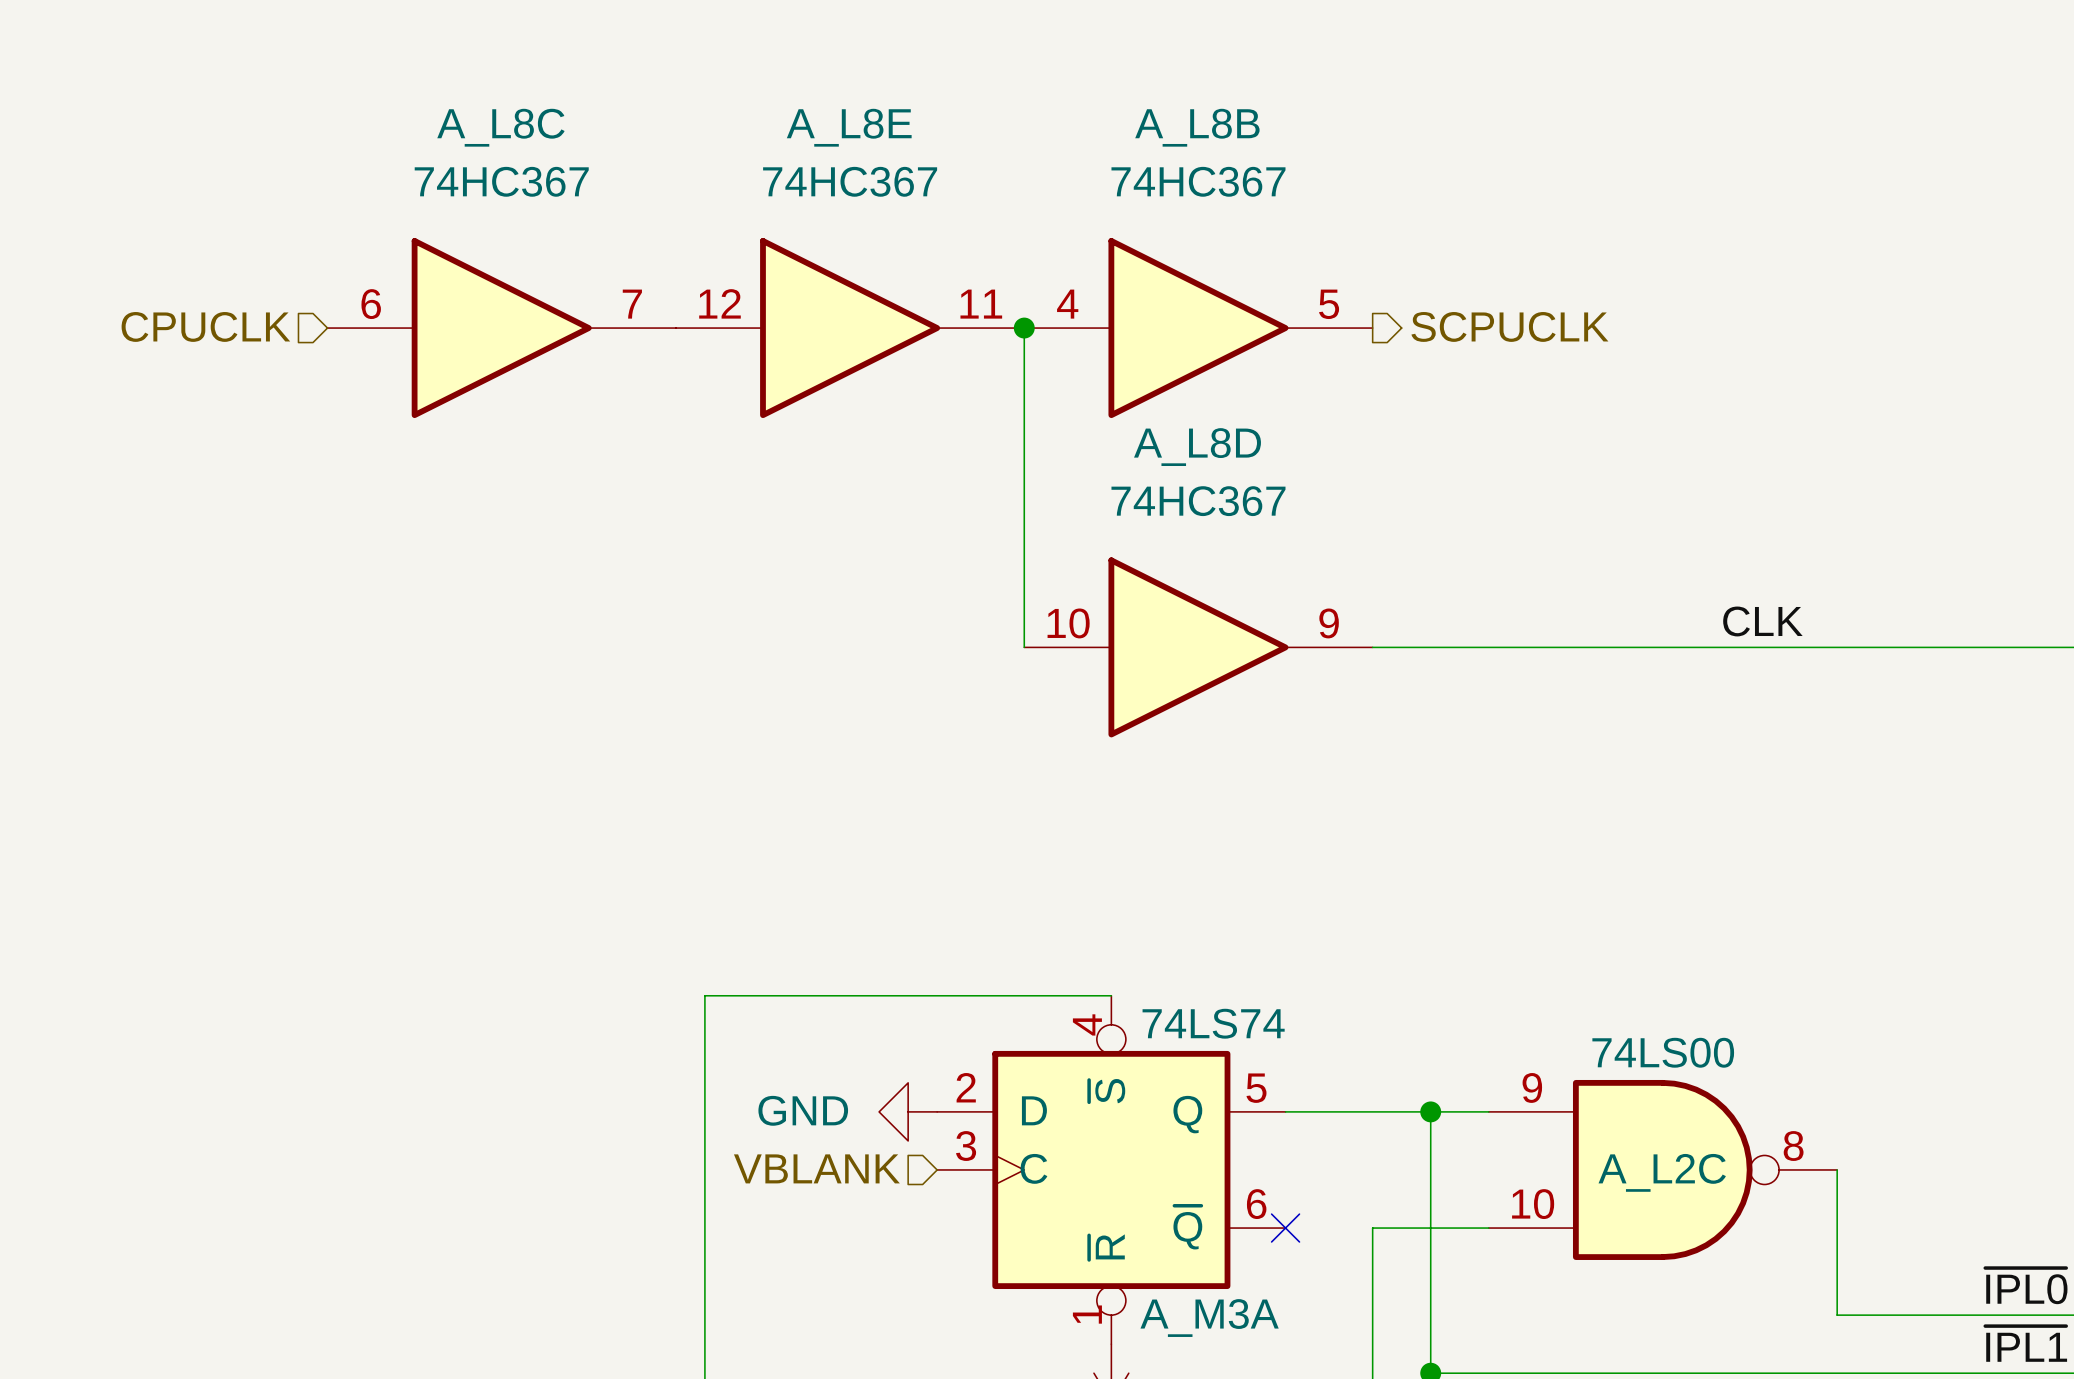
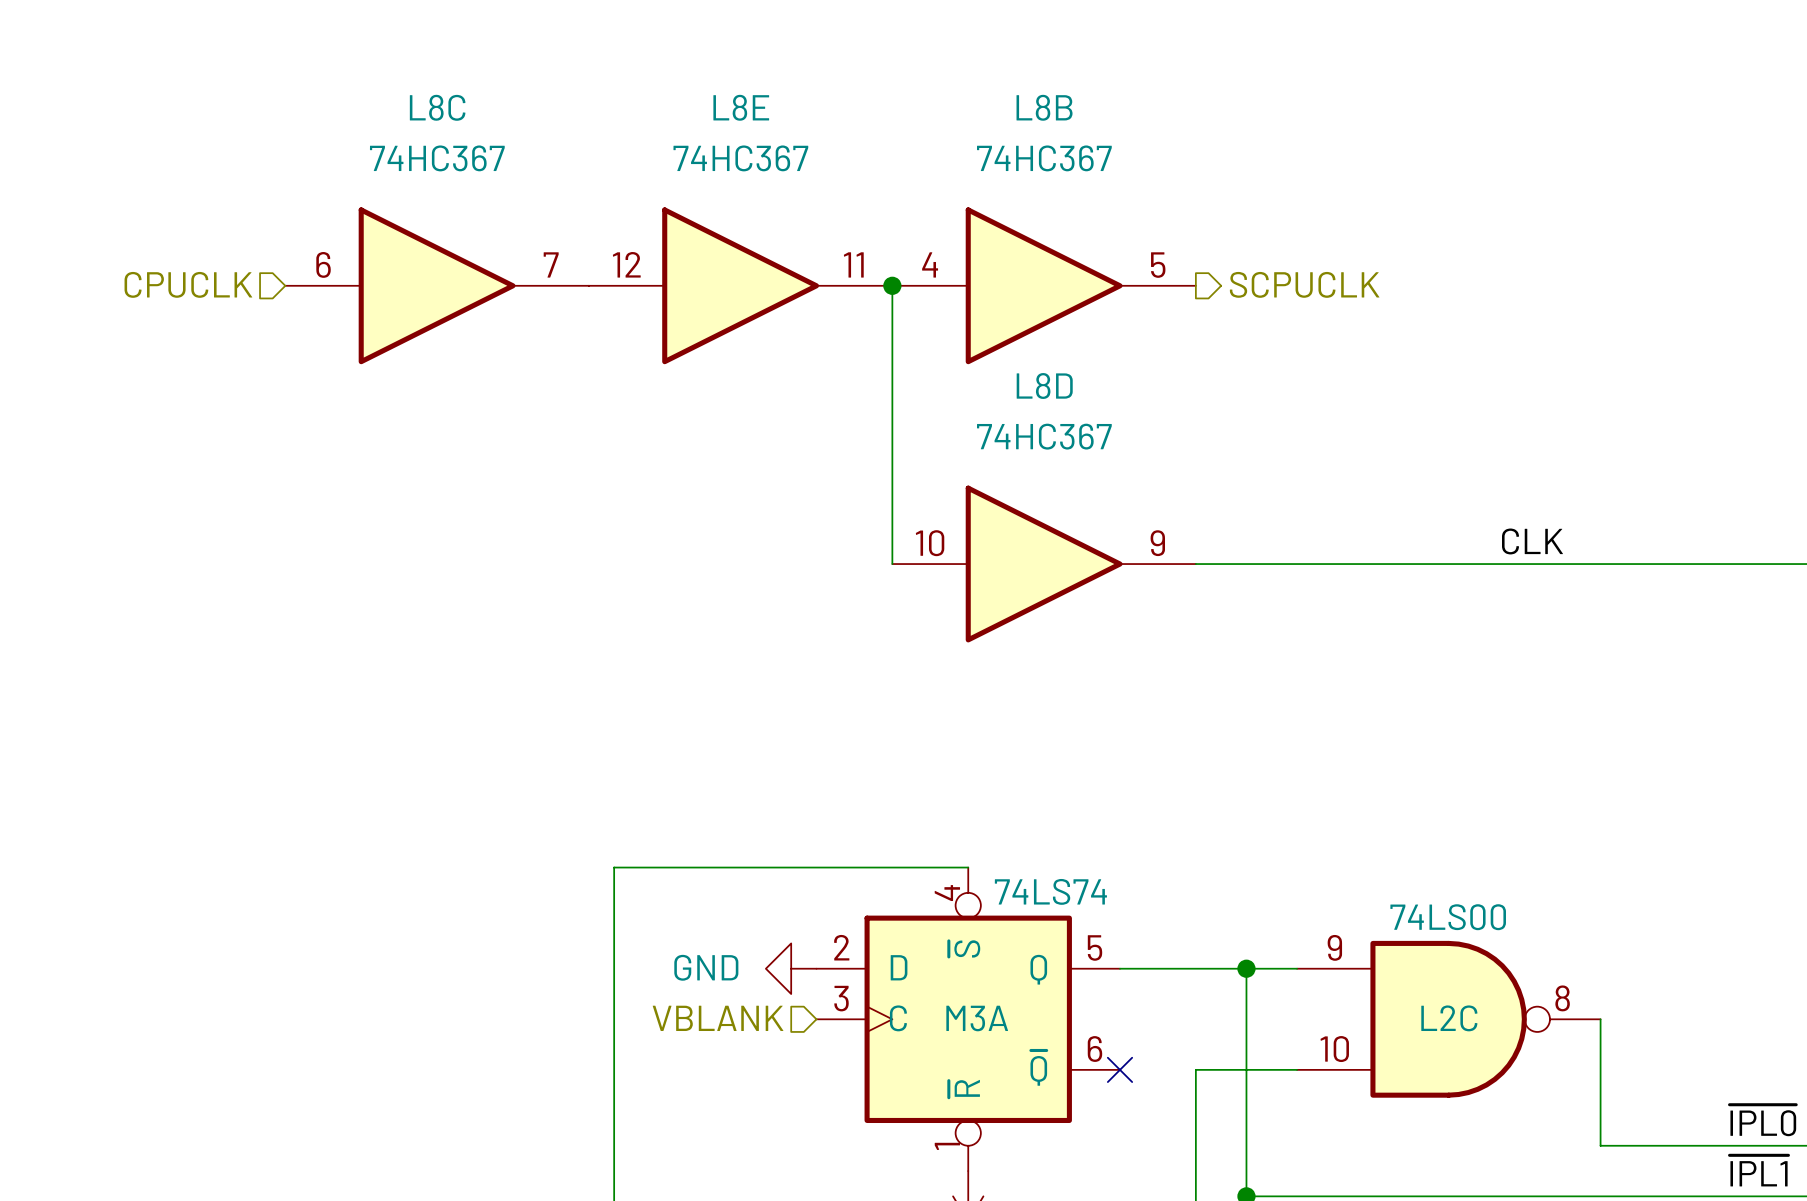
A_L8C name: A_L8C (500, 127) -> L8C (437, 107)
A_L8E name: A_L8E (849, 127) -> L8E (741, 107)
A_L8B name: A_L8B (1197, 127) -> L8B (1044, 107)
A_L8D name: A_L8D (1197, 447) -> L8D (1044, 385)
A_L2C name: A_L2C (1662, 1172) -> L2C (1449, 1018)
A_M3A name: A_M3A (1209, 1318) -> M3A (977, 1018)

